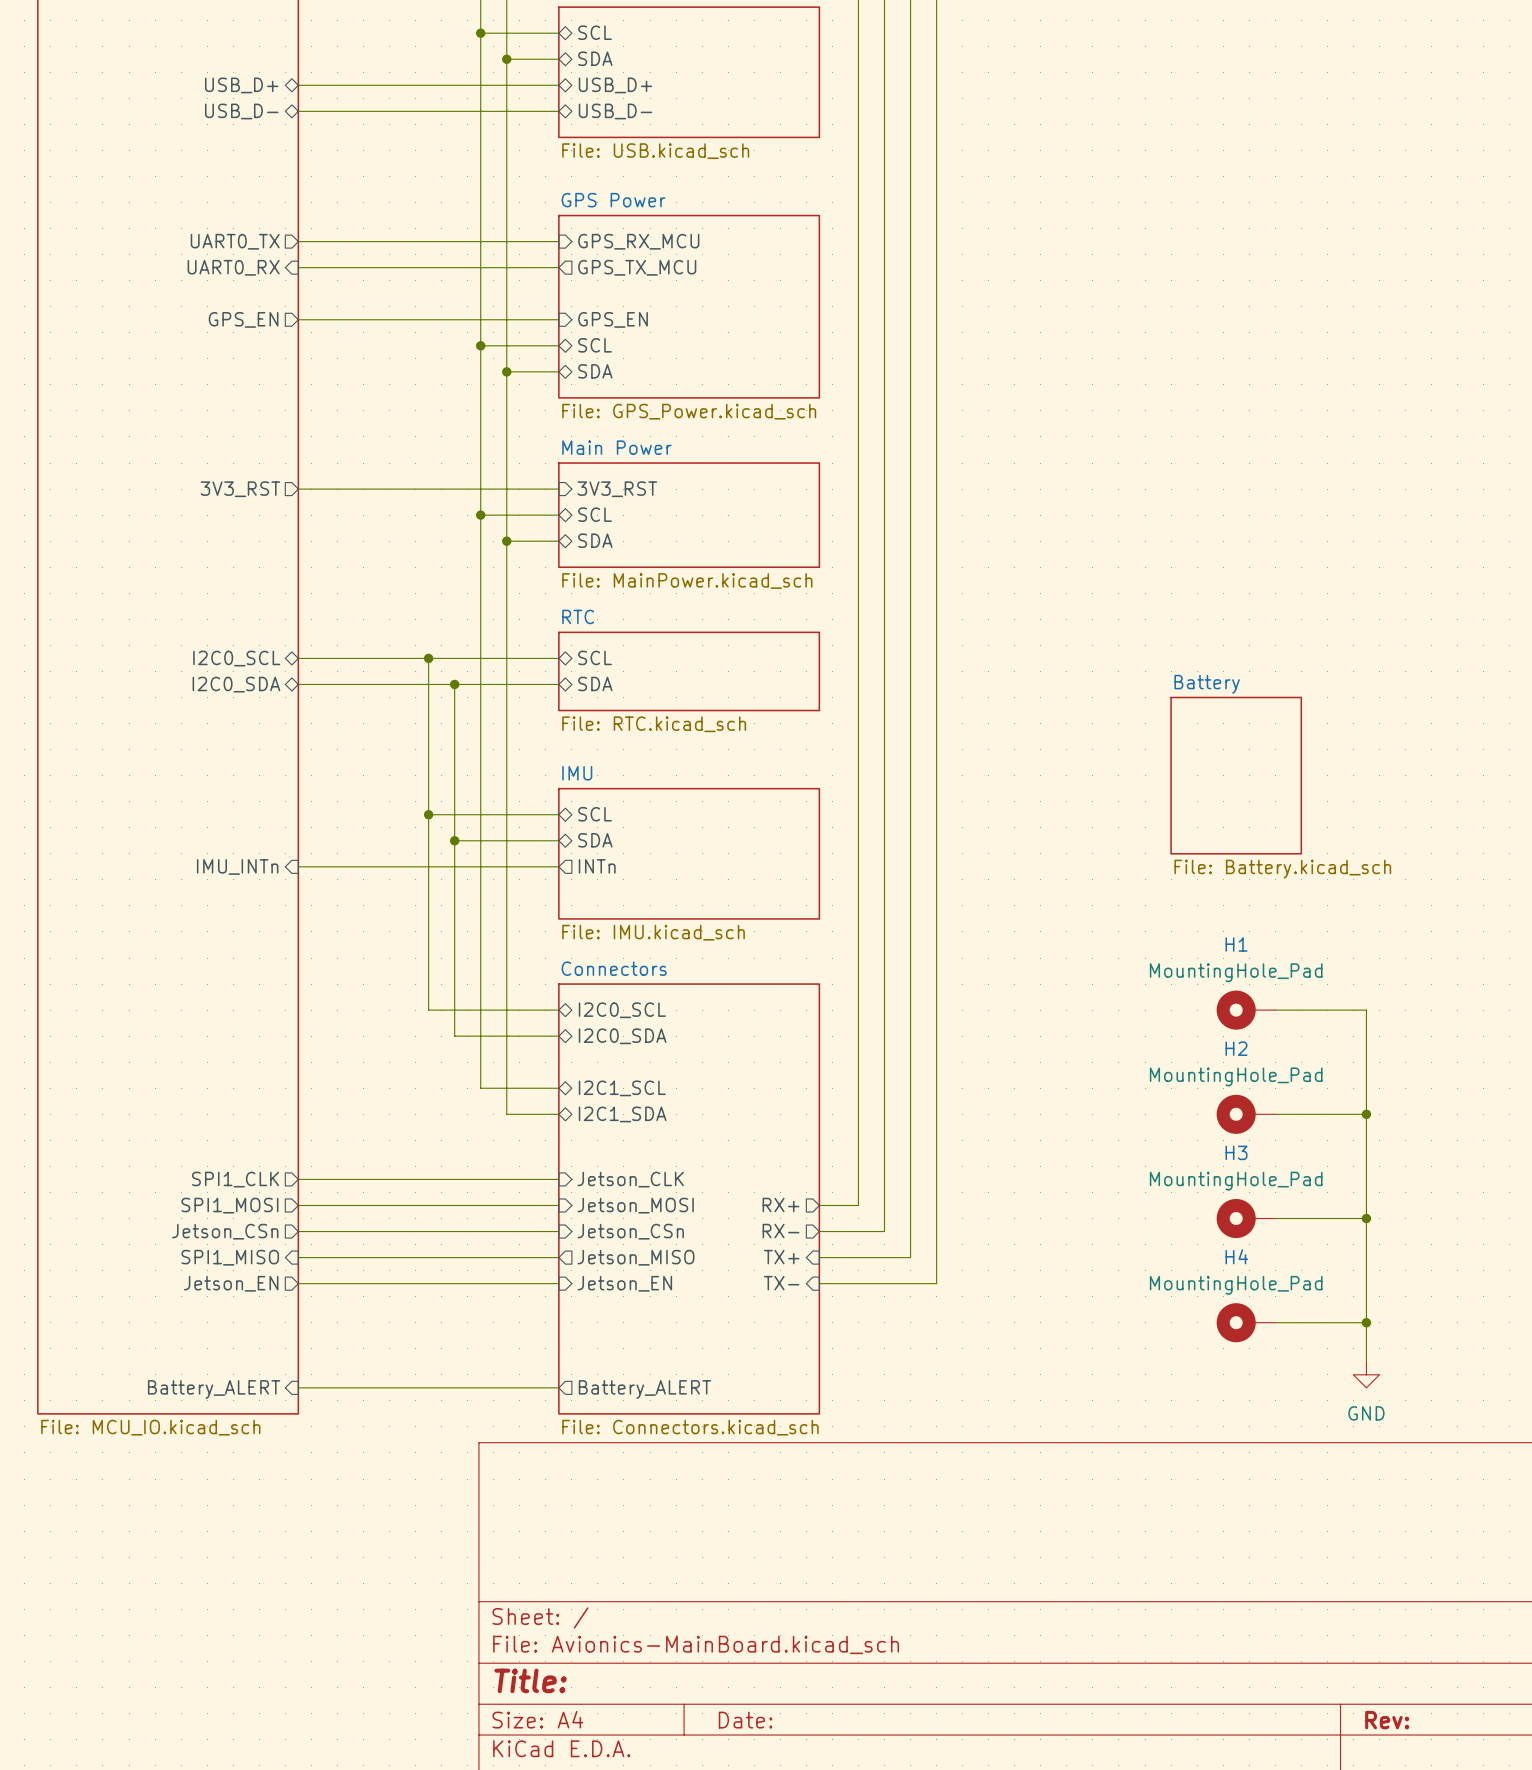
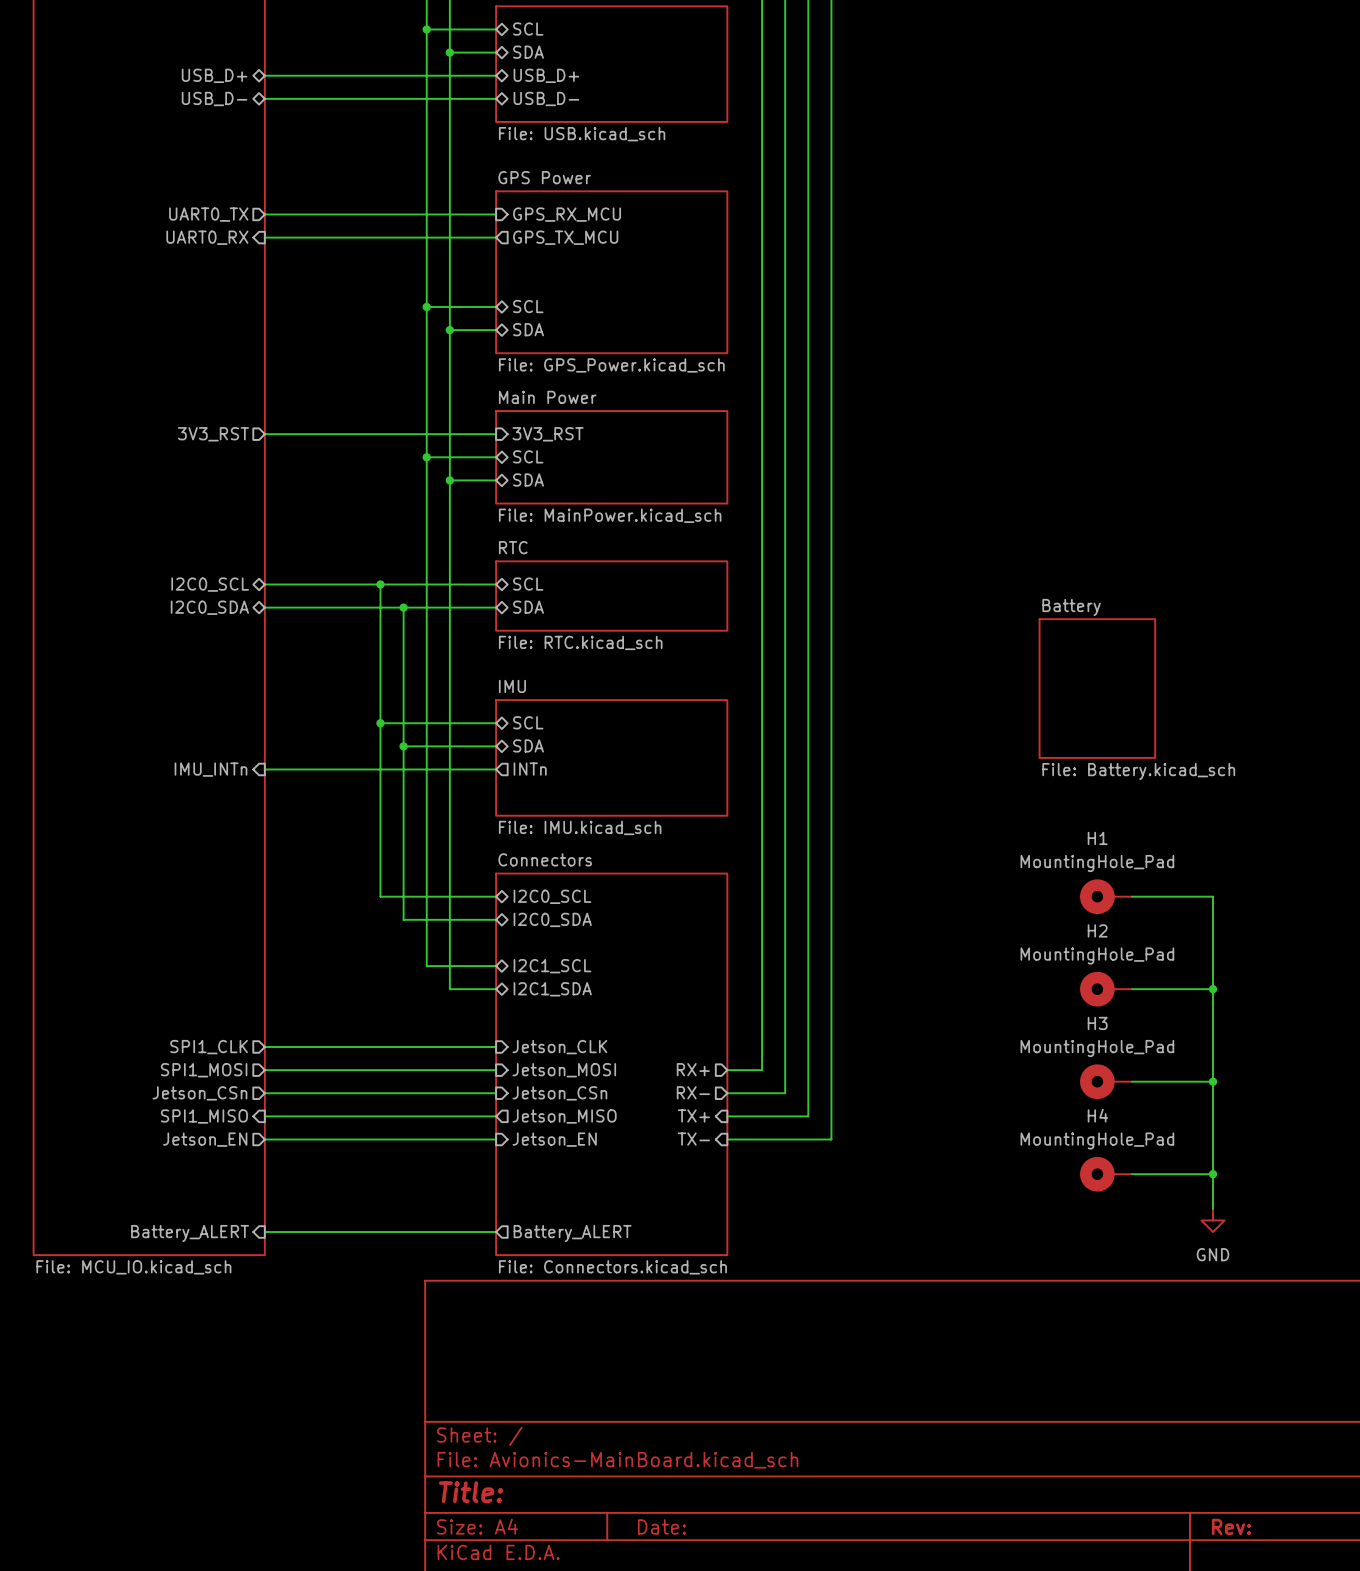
sheet pin: GPS_EN (243, 319) -> none
wire: (298, 319) (558, 319) -> none
sheet pin: GPS_EN (613, 319) -> none

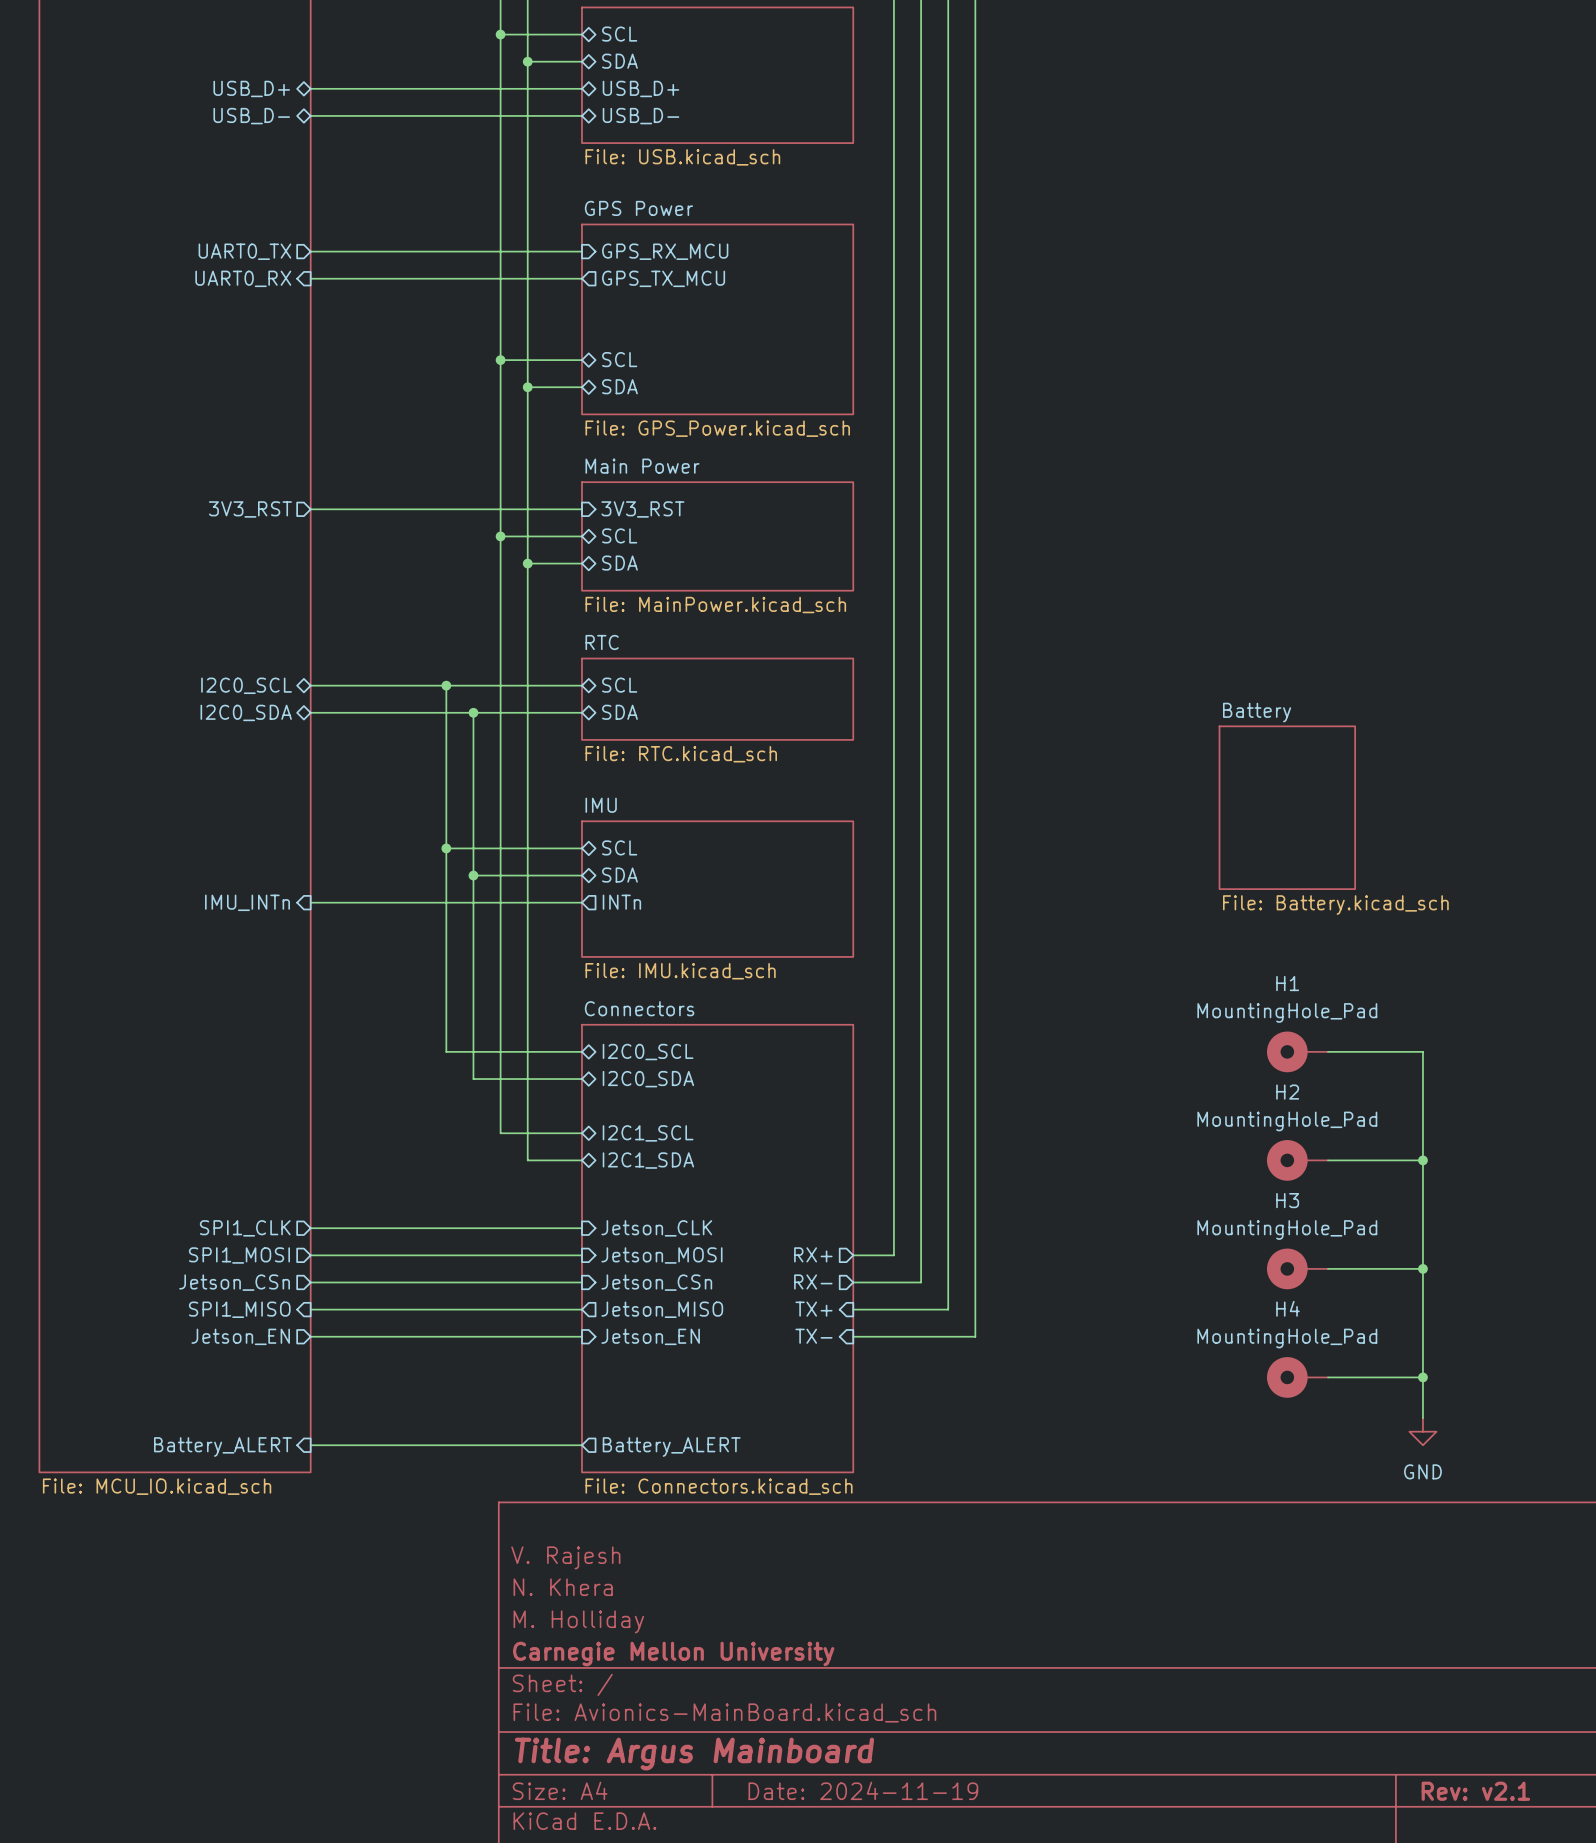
title block: none -> V. Rajesh (565, 1557)
title block: none -> N. Khera (563, 1587)
title block: none -> M. Holliday (578, 1621)
title block: none -> Carnegie Mellon University (673, 1653)
title block: Title: (470, 1492) -> Title: Argus Mainboard (694, 1754)
title block: Date: (661, 1526) -> Date: 2024-11-19 (863, 1790)
title block: Rev: (1231, 1526) -> Rev: v2.1 (1475, 1791)

